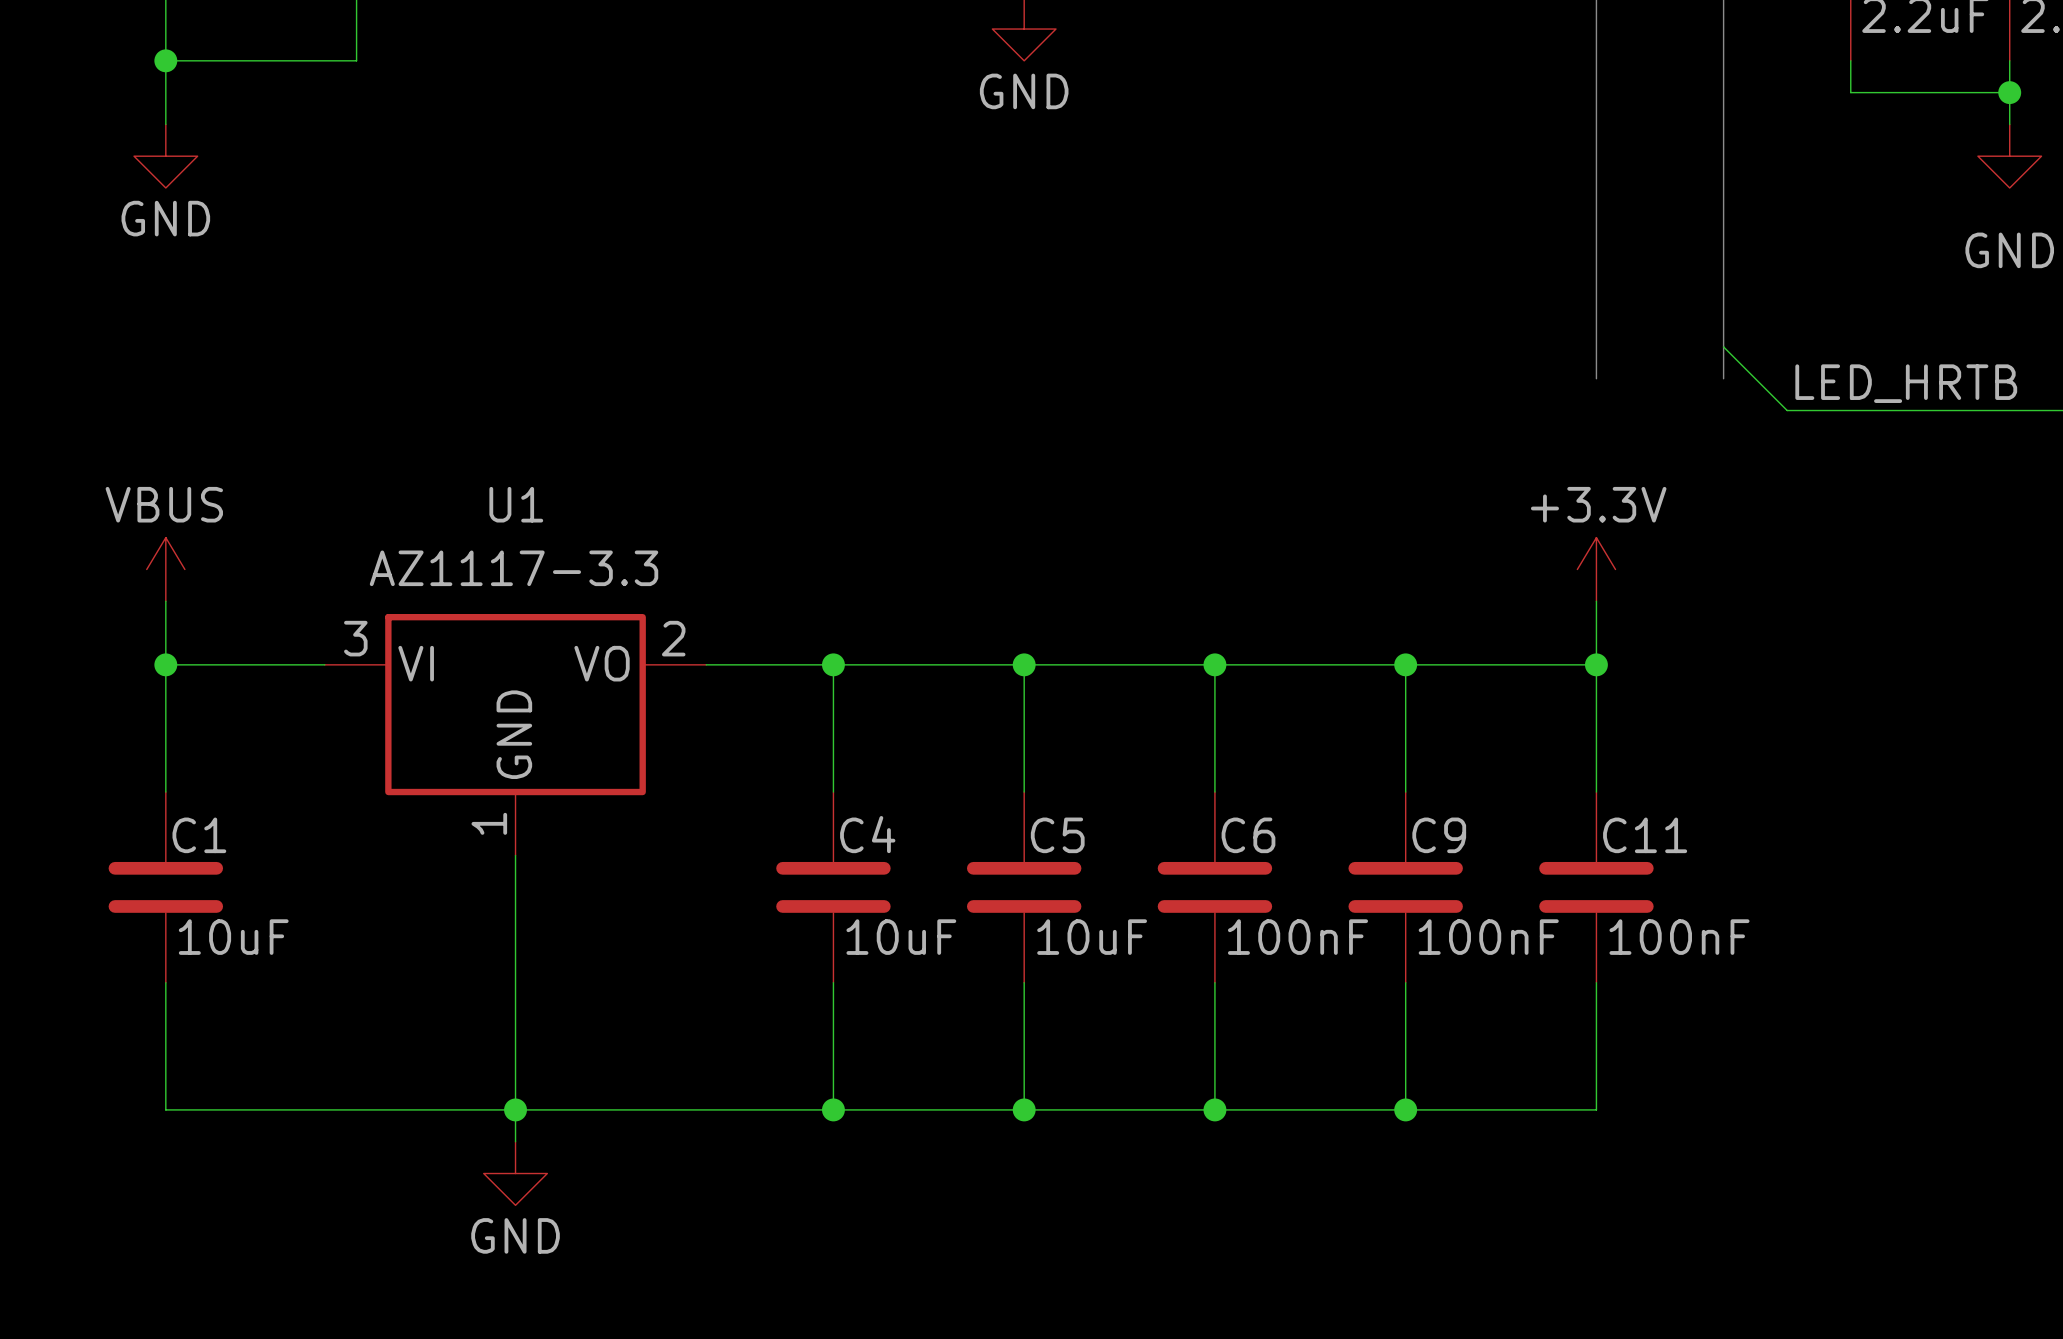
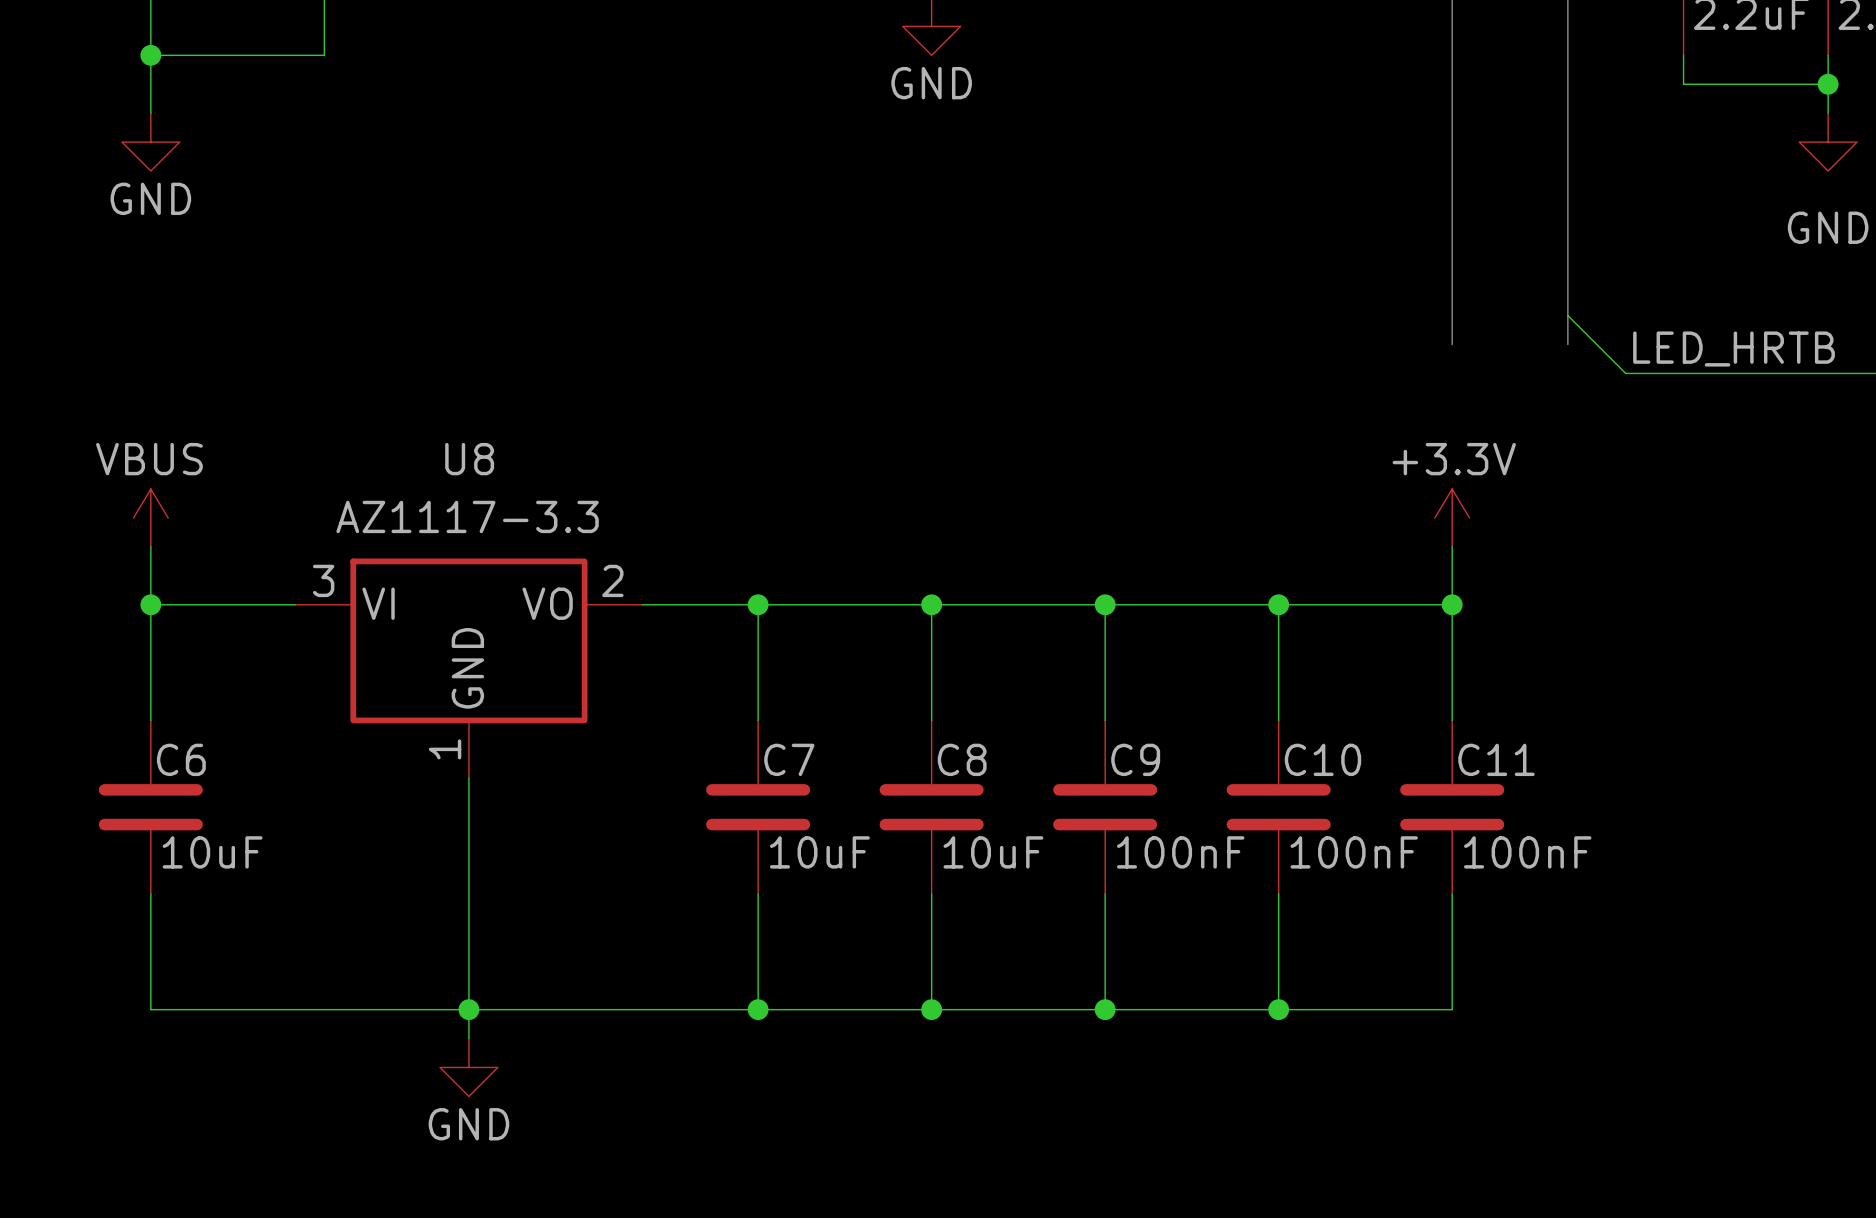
U1 name: U1 (516, 504) -> U8 (469, 459)
C4 name: C4 (867, 834) -> C7 (789, 759)
C1 name: C1 (199, 835) -> C6 (181, 759)
C5 name: C5 (1057, 835) -> C8 (962, 759)
C6 name: C6 (1248, 835) -> C9 (1135, 759)
C9 name: C9 (1439, 835) -> C10 (1322, 759)

